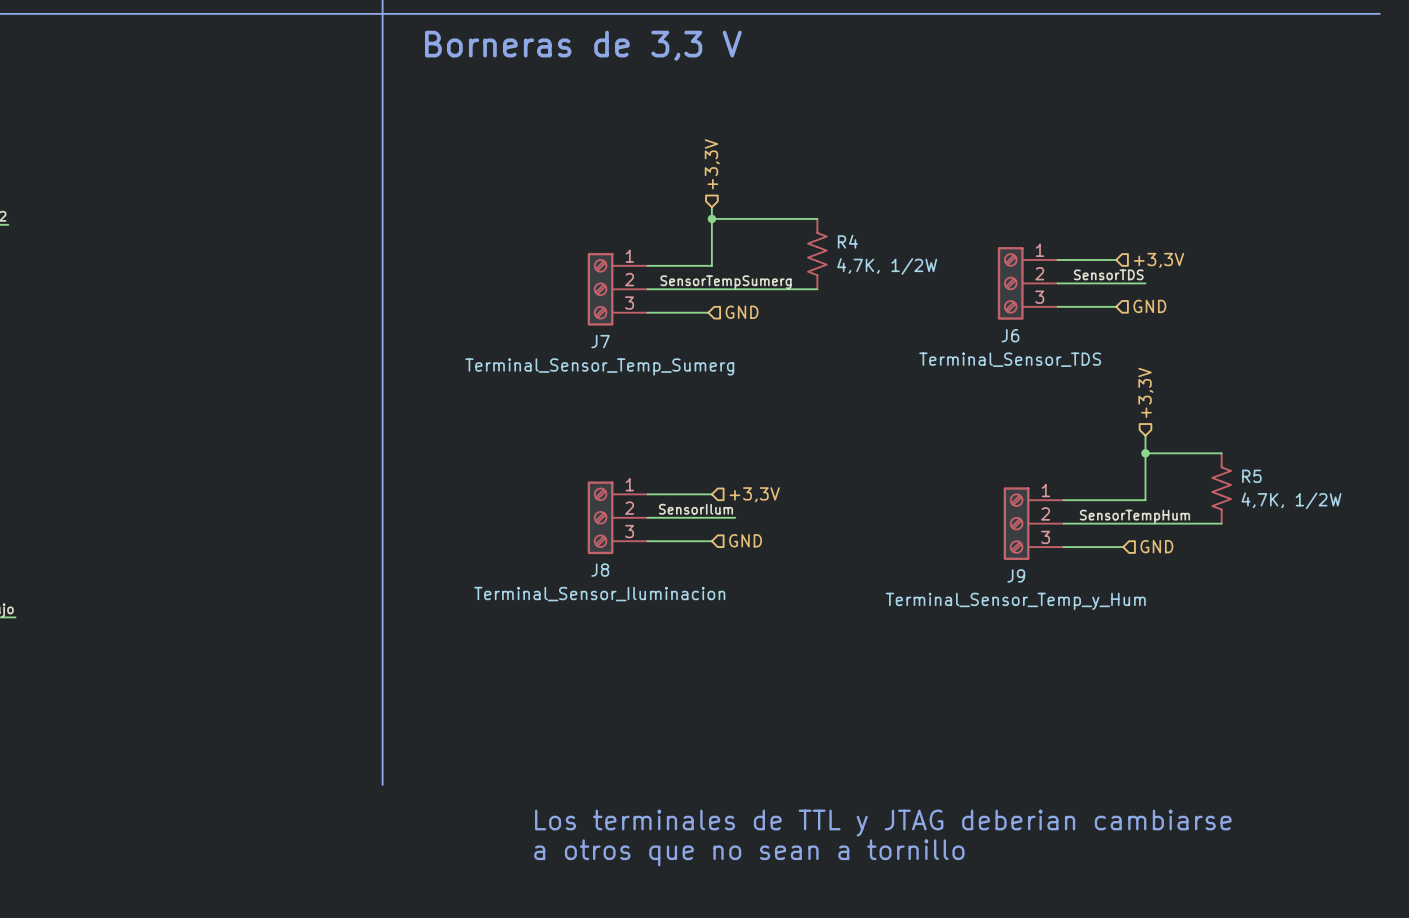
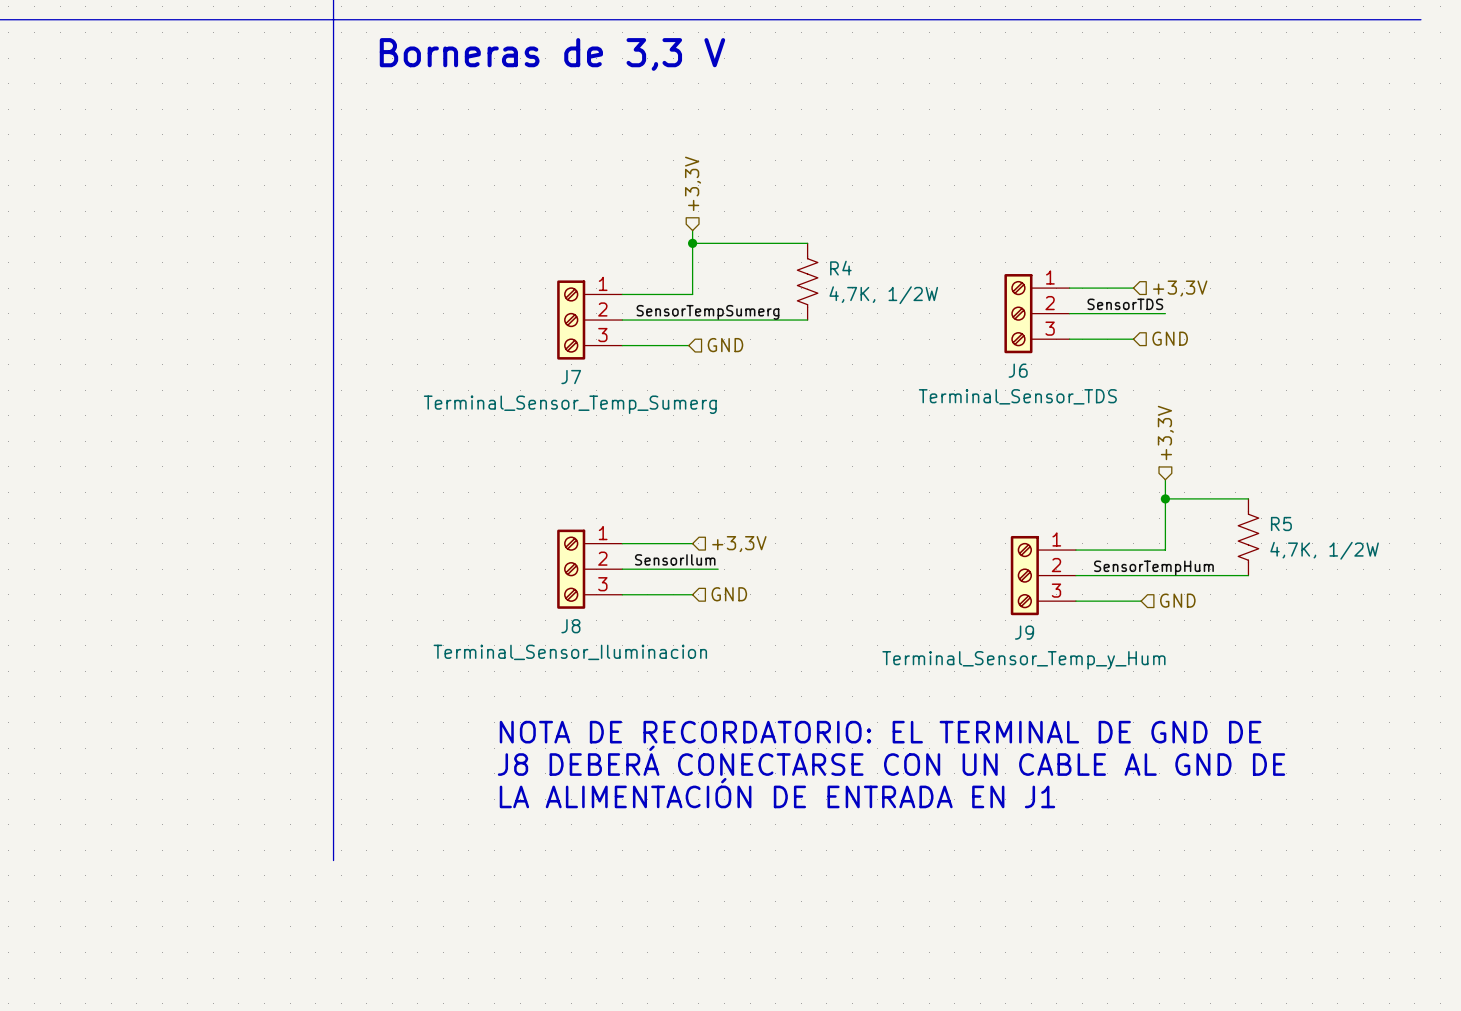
text: none -> NOTA DE RECORDATORIO: EL TERMINAL DE GND DE (880, 732)
text: none -> J8 DEBERÁ CONECTARSE CON UN CABLE AL GND DE (891, 760)
text: none -> LA ALIMENTACIÓN DE ENTRADA EN J1 (777, 793)
text: Los terminales de TTL y JTAG deberian cambiarse (883, 823) -> none
text: a otros que no sean a tornillo (749, 852) -> none

